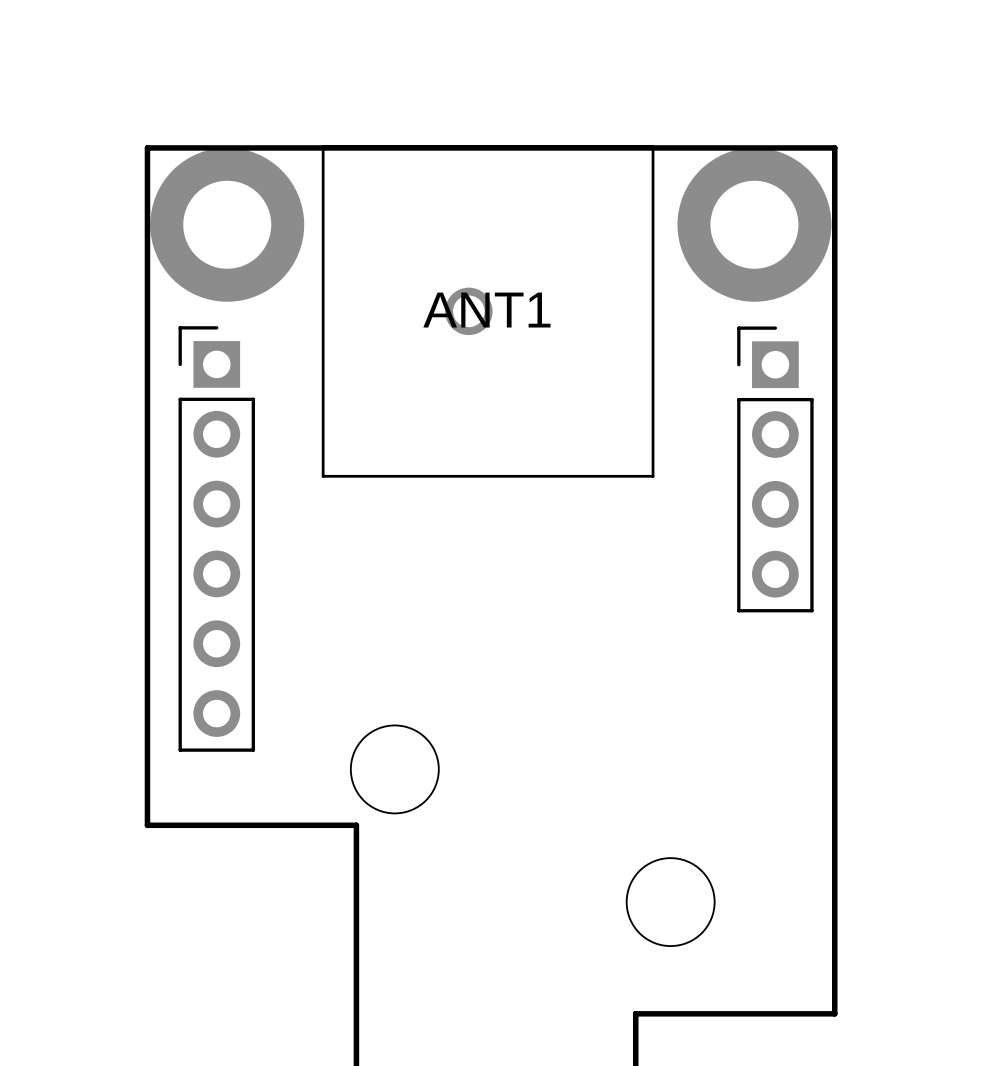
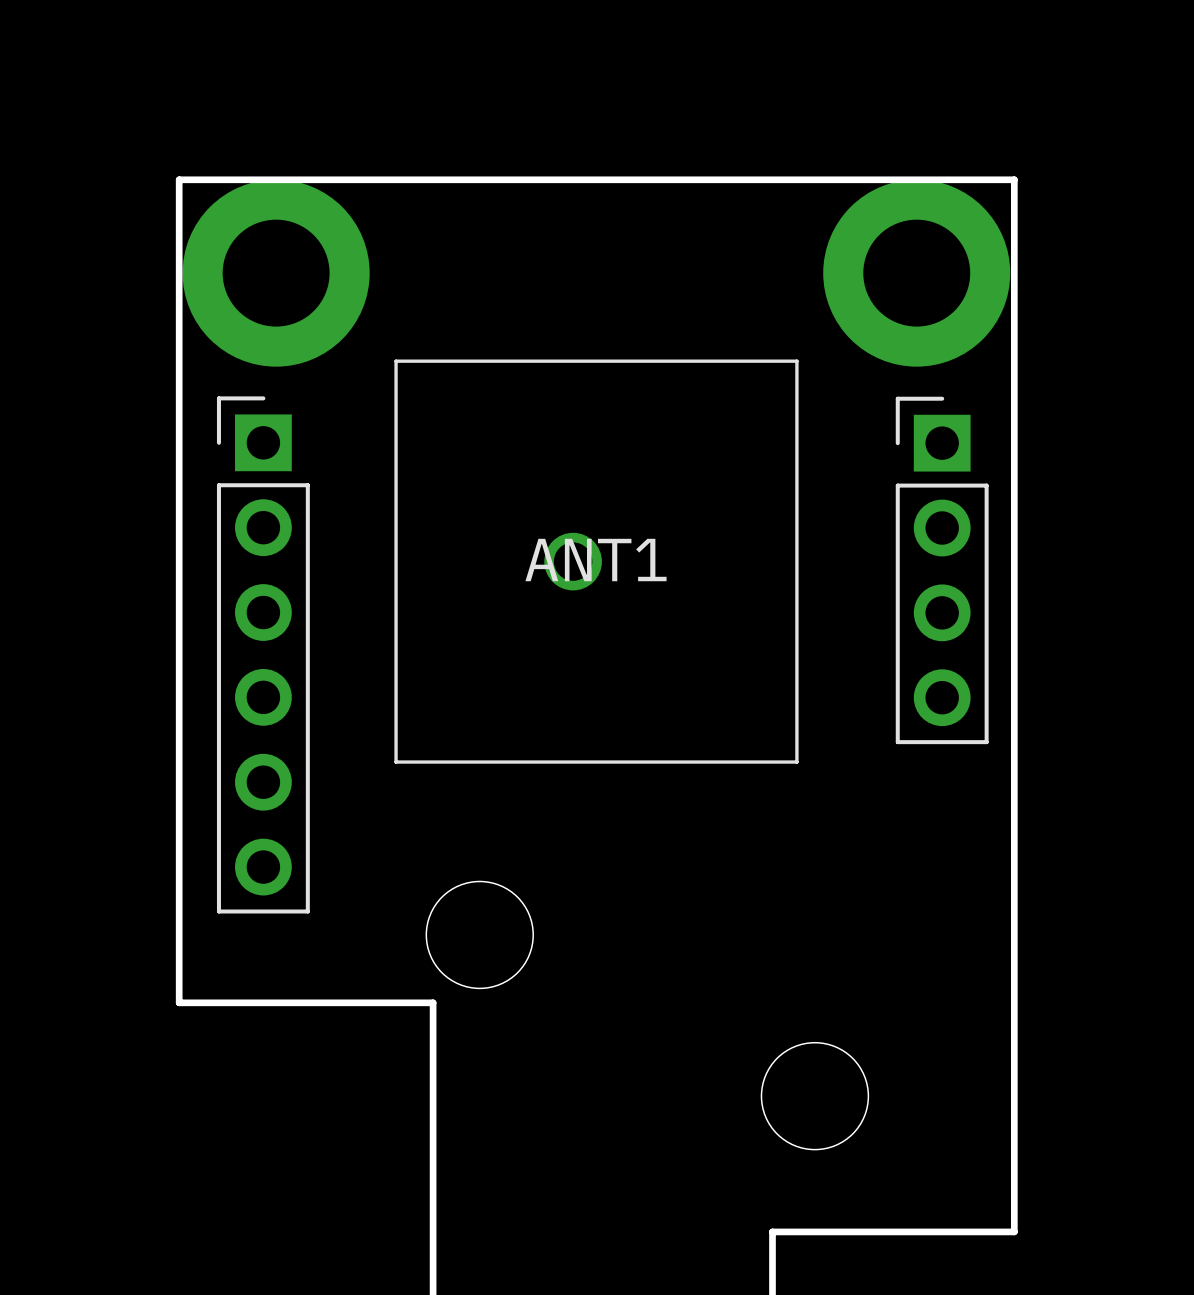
ANT1 position: (488, 311) -> (596, 561)

